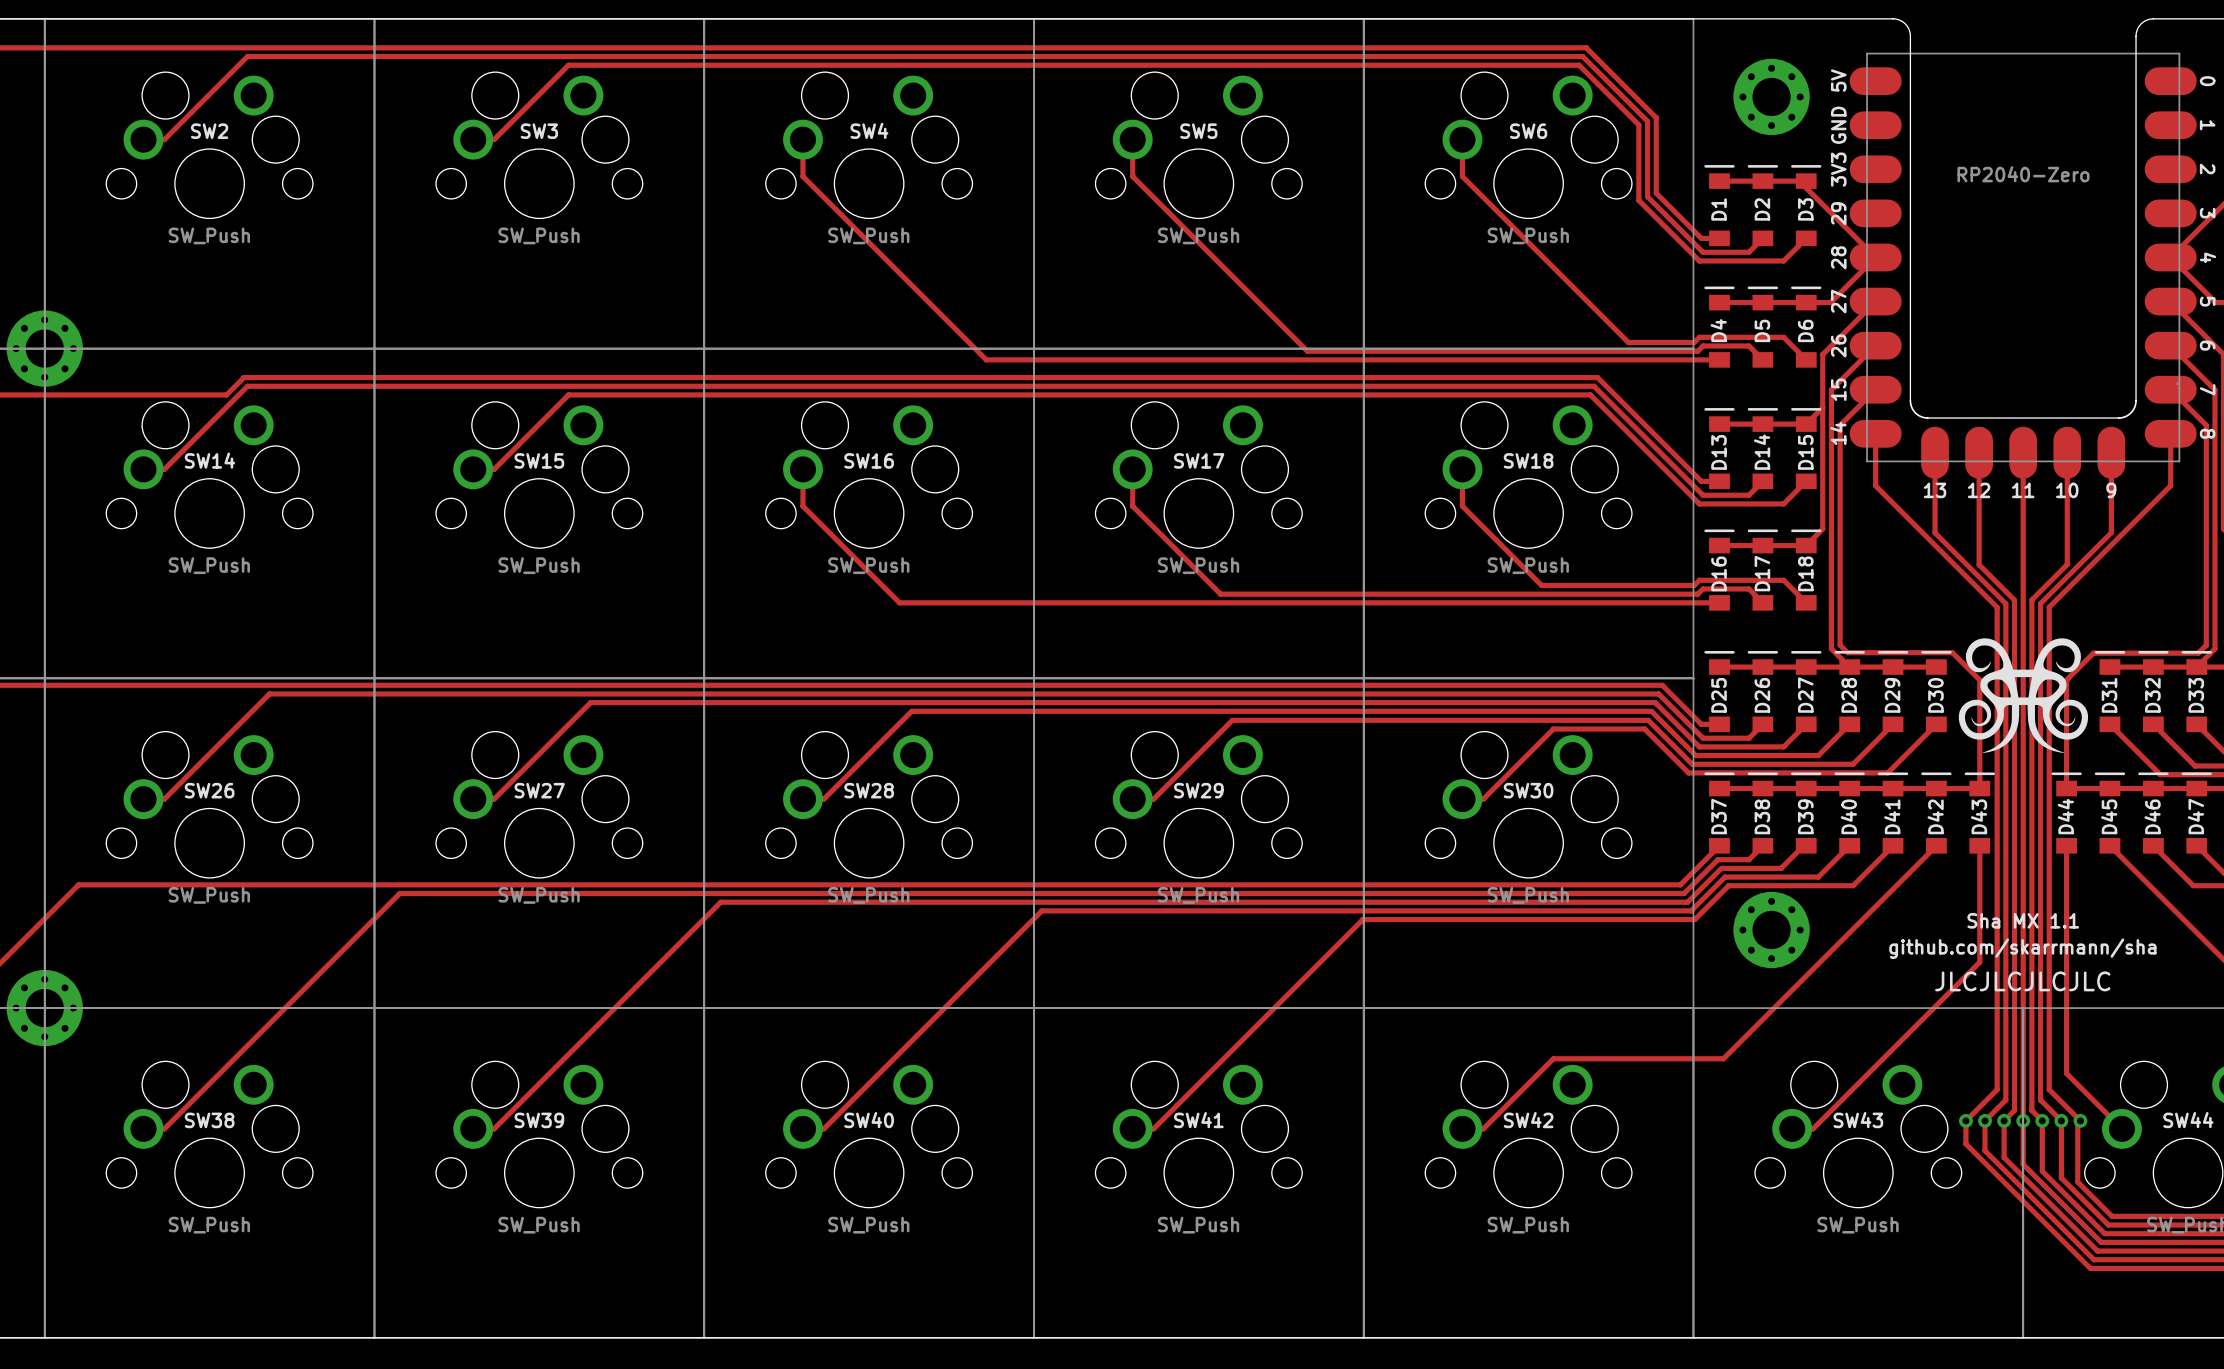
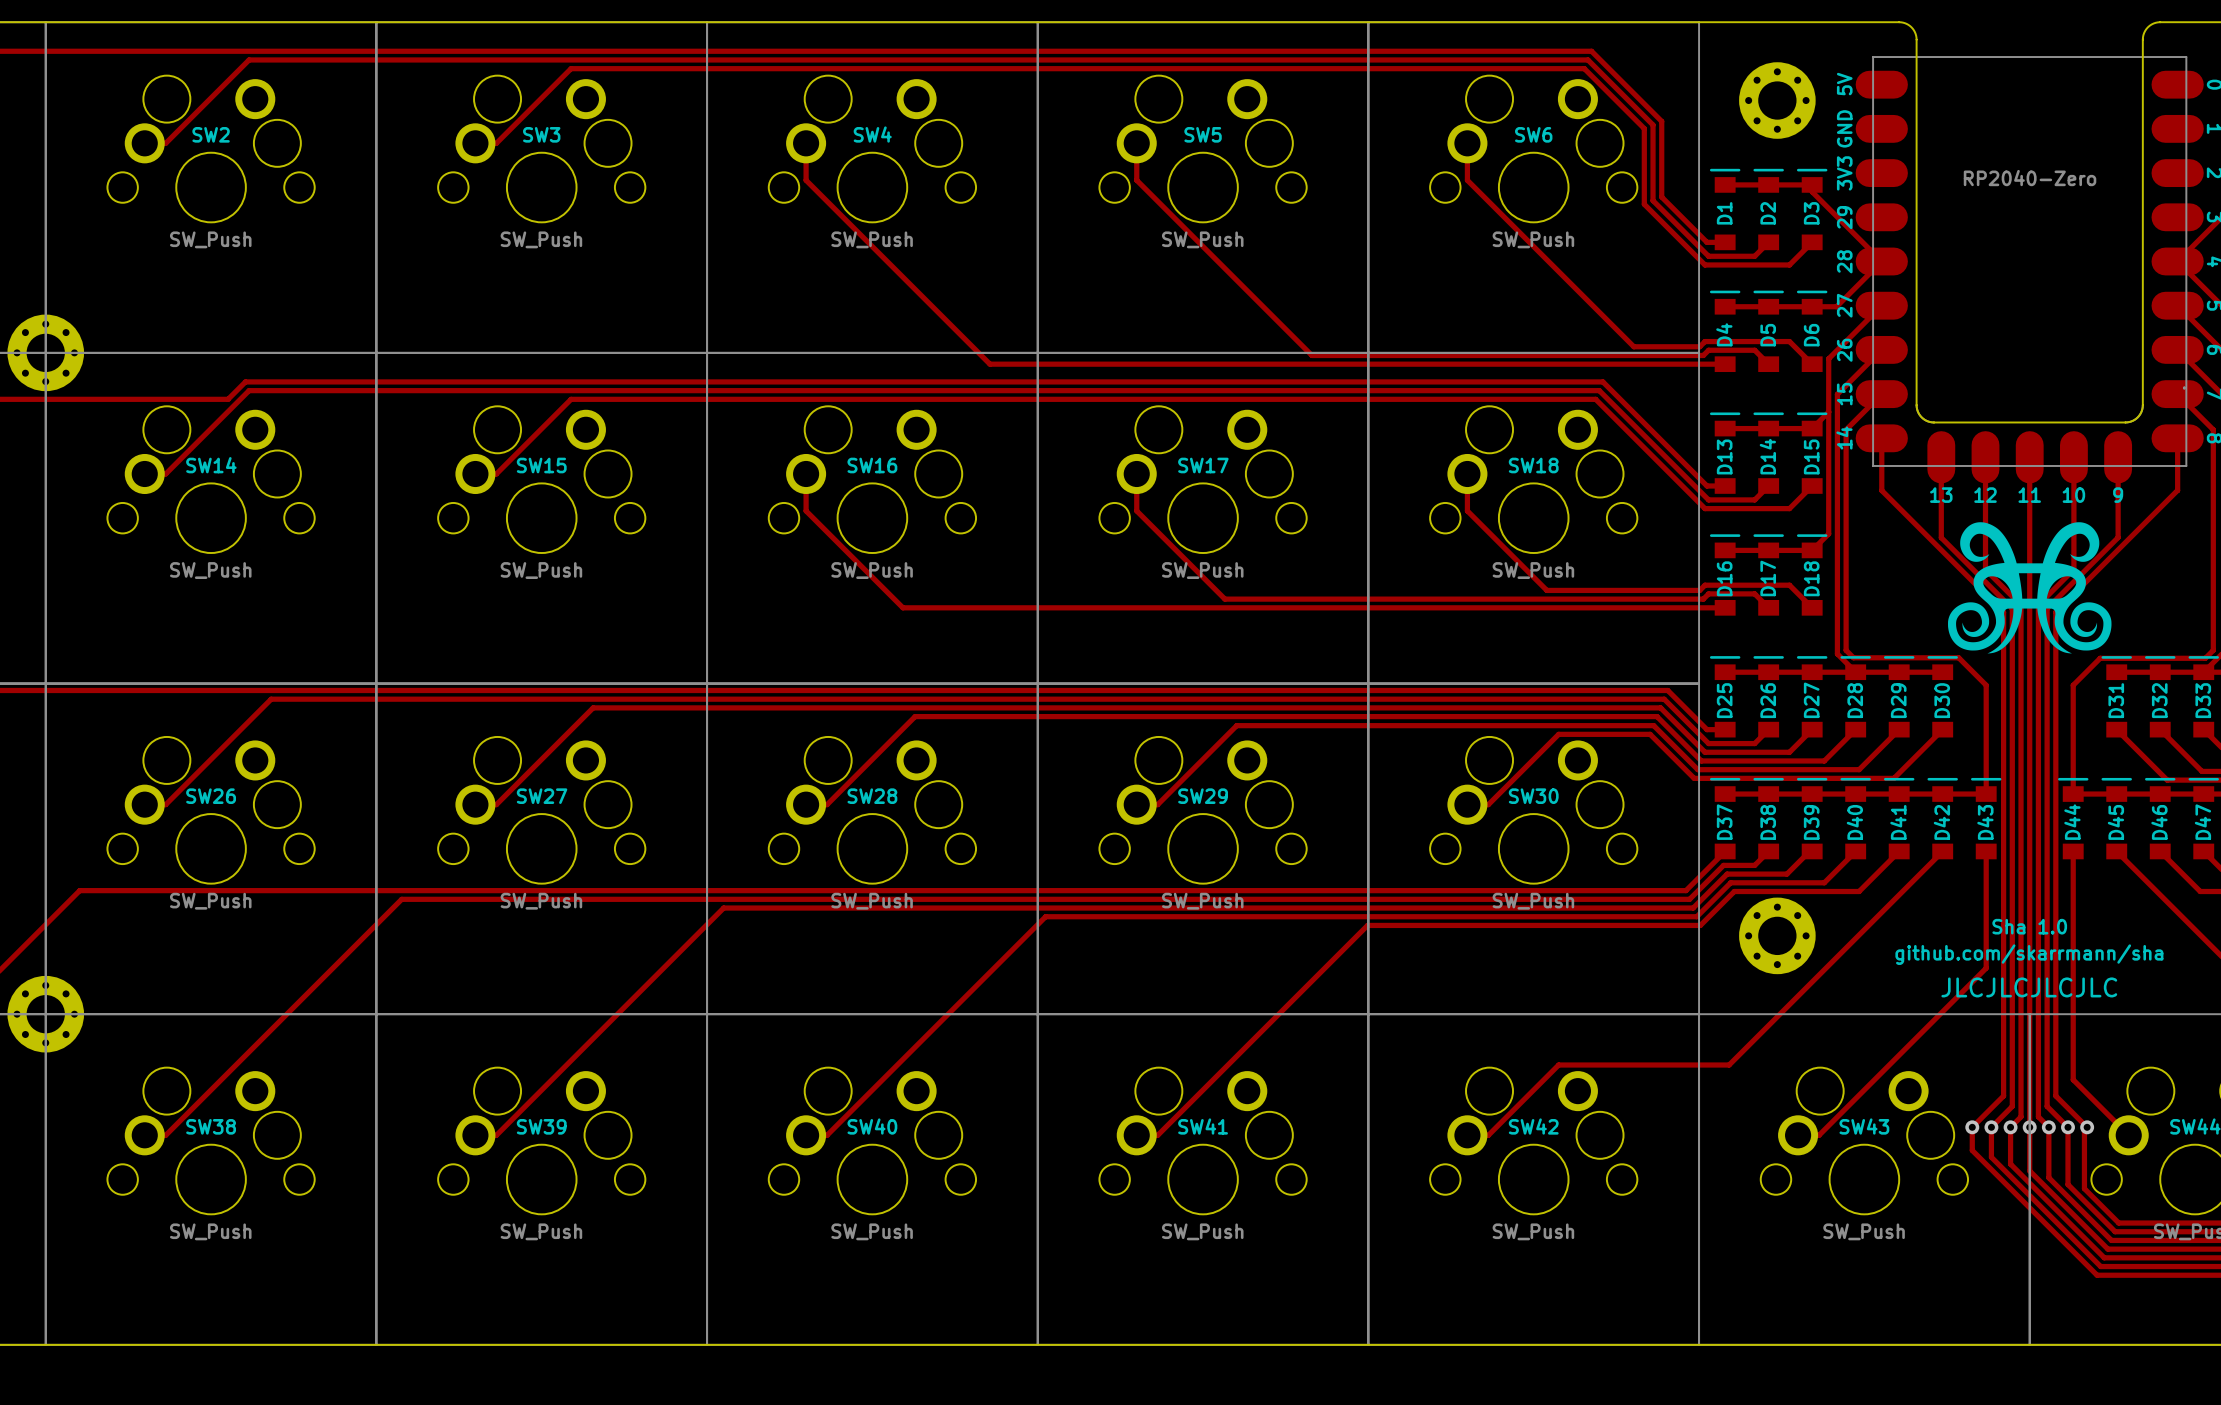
drawing: none -> [1948, 522, 2112, 654]
drawing: [1958, 638, 2089, 754] -> none
text: Sha MX 1.1 (2023, 920) -> Sha 1.0 (2029, 926)

